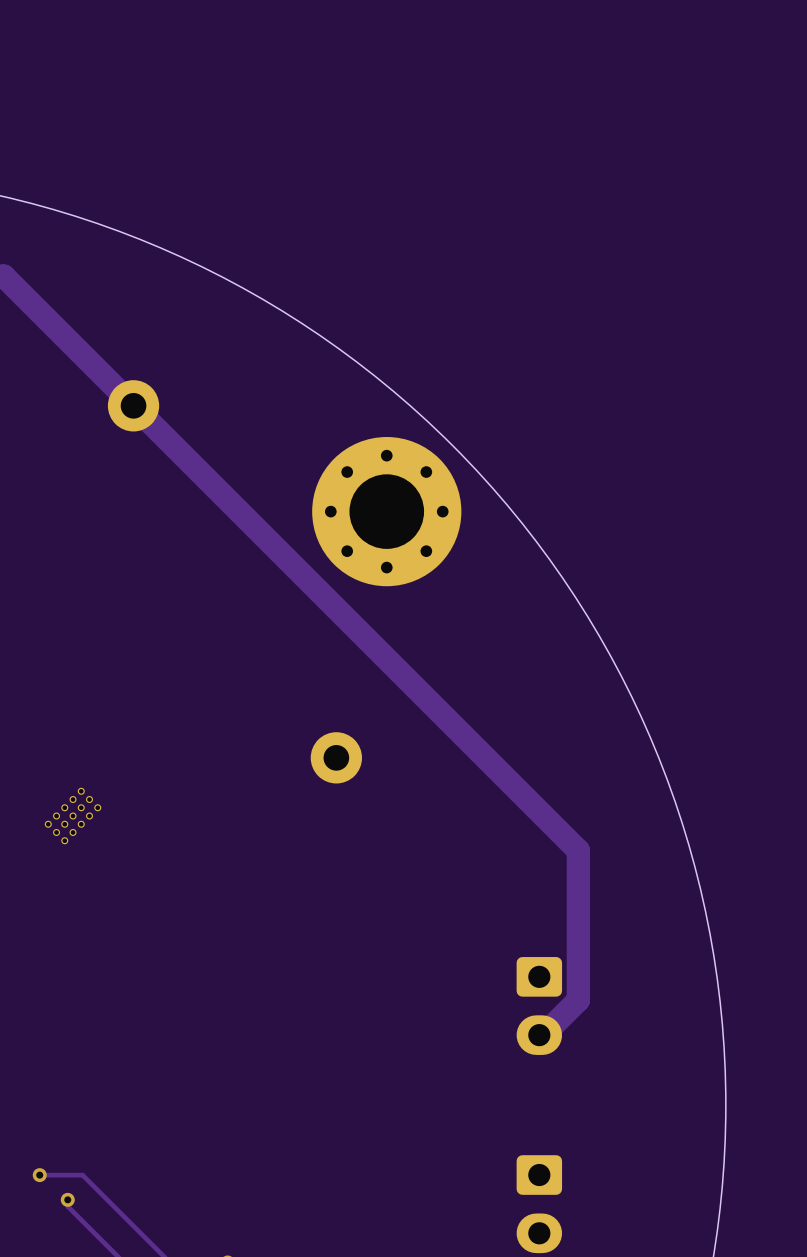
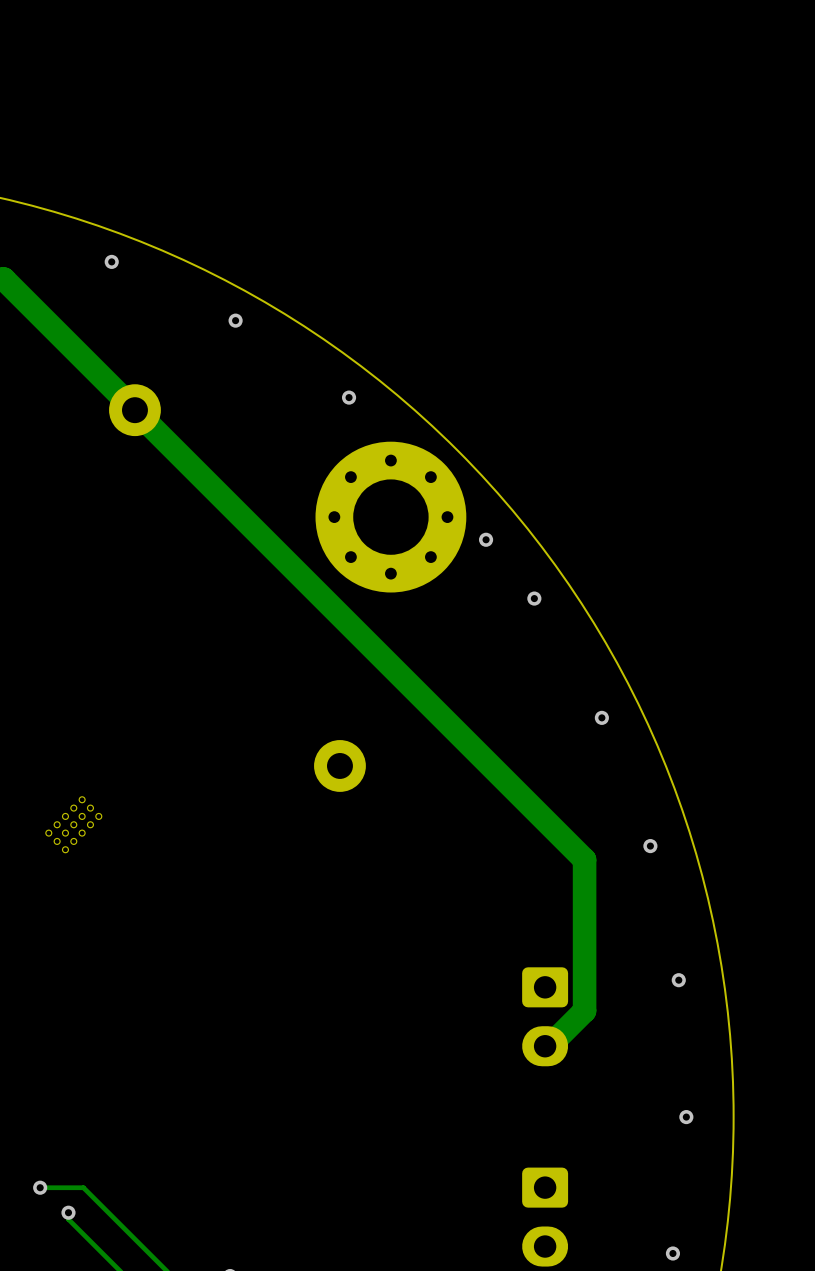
via: none -> (111, 261)
via: none -> (235, 320)
via: none -> (349, 397)
via: none -> (486, 539)
via: none -> (534, 598)
via: none -> (601, 717)
via: none -> (650, 846)
via: none -> (678, 980)
via: none -> (686, 1117)
via: none -> (672, 1253)

